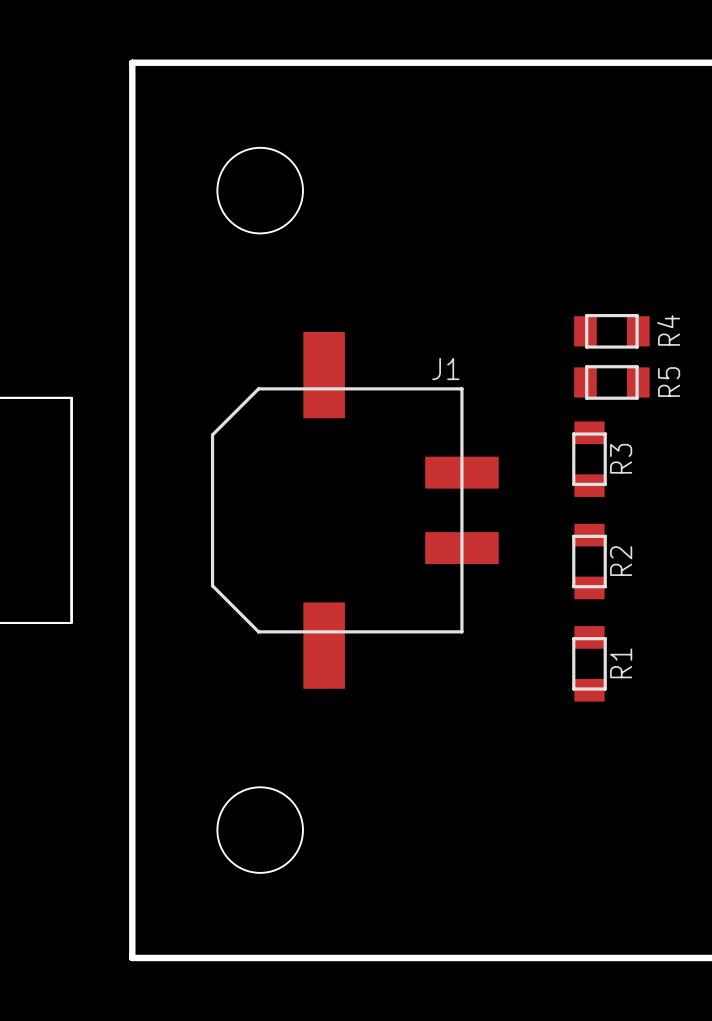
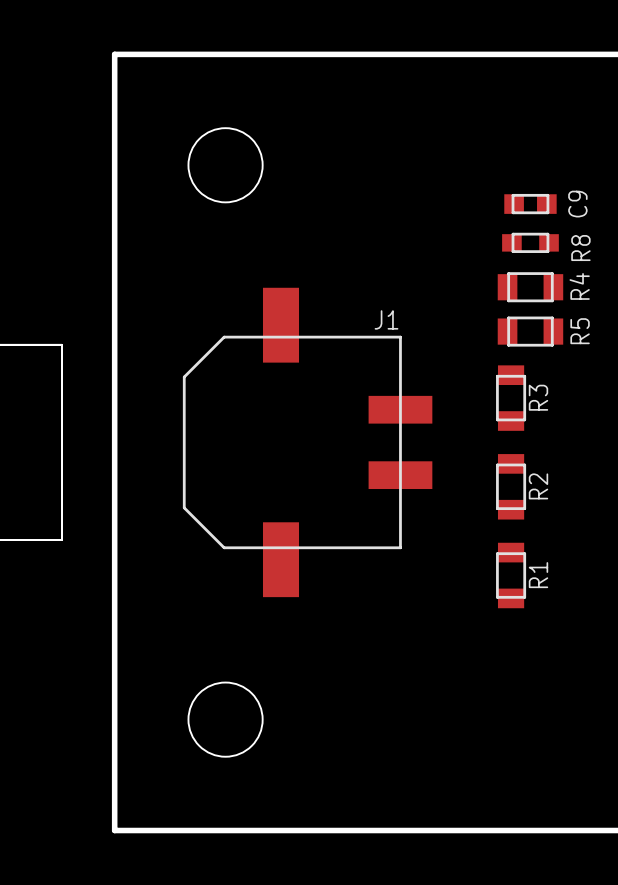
C9: none -> (530, 204)
R8: none -> (530, 242)

